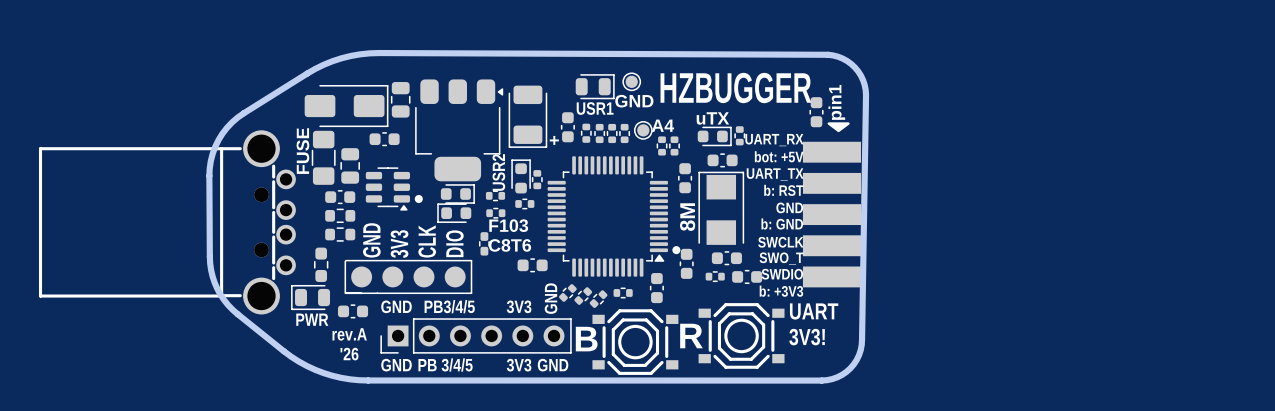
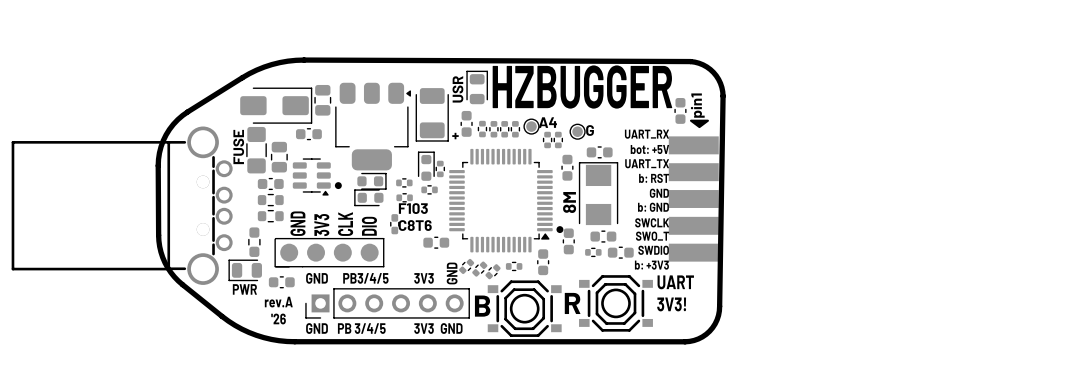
part position: (631, 81) -> (577, 131)
text: none -> USR (457, 89)
part rotation: 0° (595, 86) -> 90° counterclockwise (477, 87)
text: HZBUGGER (735, 88) -> none
text: GND (634, 101) -> none
text: USR1 (595, 108) -> HZBUGGER (582, 87)
text: uTX (712, 118) -> none
text: none -> G (590, 130)
part: (739, 135) -> none
part: (714, 136) -> none
text: USR2 (498, 172) -> none

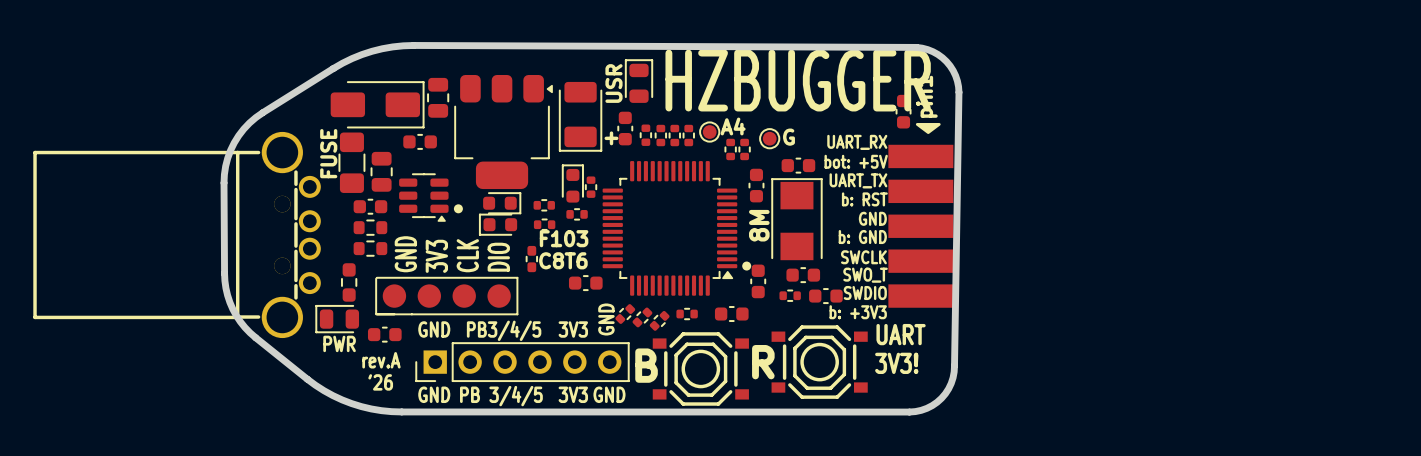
part rotation: 0° (543, 262) -> 90° clockwise (731, 314)

